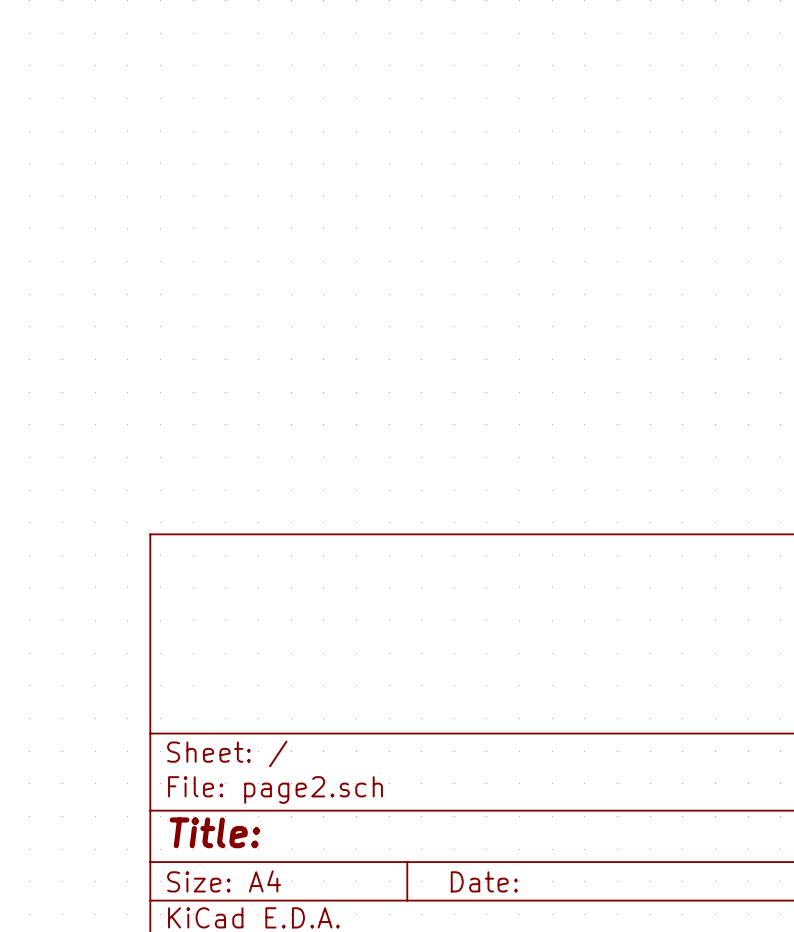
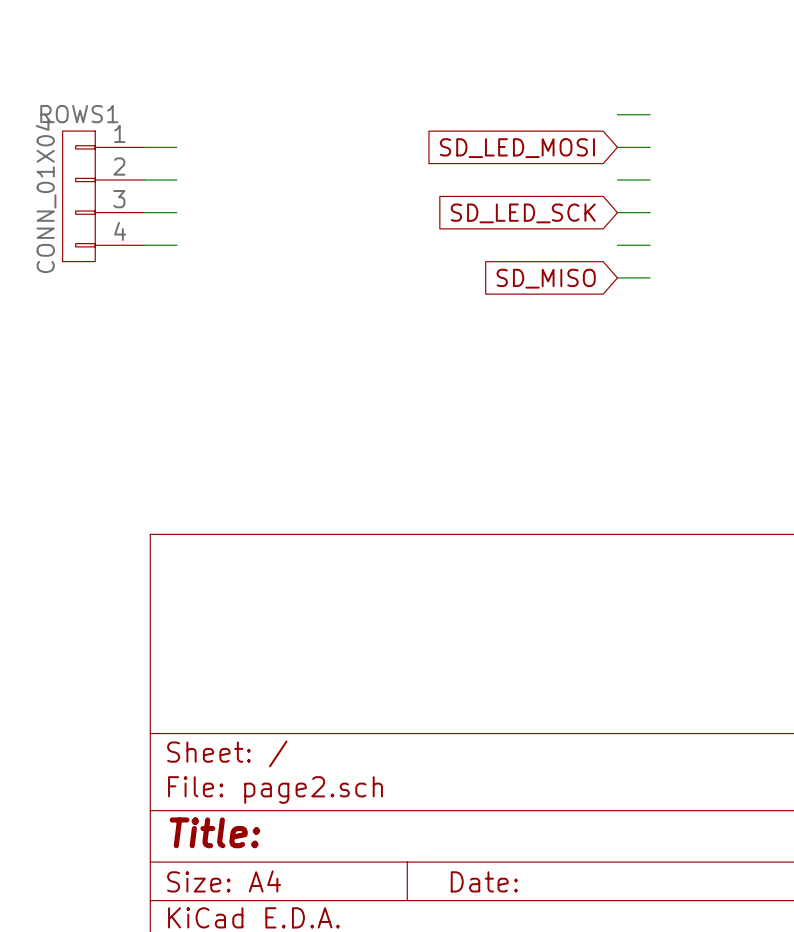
wire: none -> (617, 114) (650, 114)
wire: none -> (144, 147) (176, 147)
wire: none -> (617, 147) (650, 147)
global label: none -> SD_LED_MOSI (517, 148)
wire: none -> (144, 180) (176, 180)
wire: none -> (617, 180) (650, 180)
ROWS1: none -> CONN_01X04 (103, 196)
wire: none -> (144, 212) (176, 212)
wire: none -> (617, 212) (650, 212)
global label: none -> SD_LED_SCK (523, 213)
wire: none -> (144, 245) (176, 245)
wire: none -> (617, 245) (650, 245)
wire: none -> (617, 277) (650, 277)
global label: none -> SD_MISO (546, 278)

